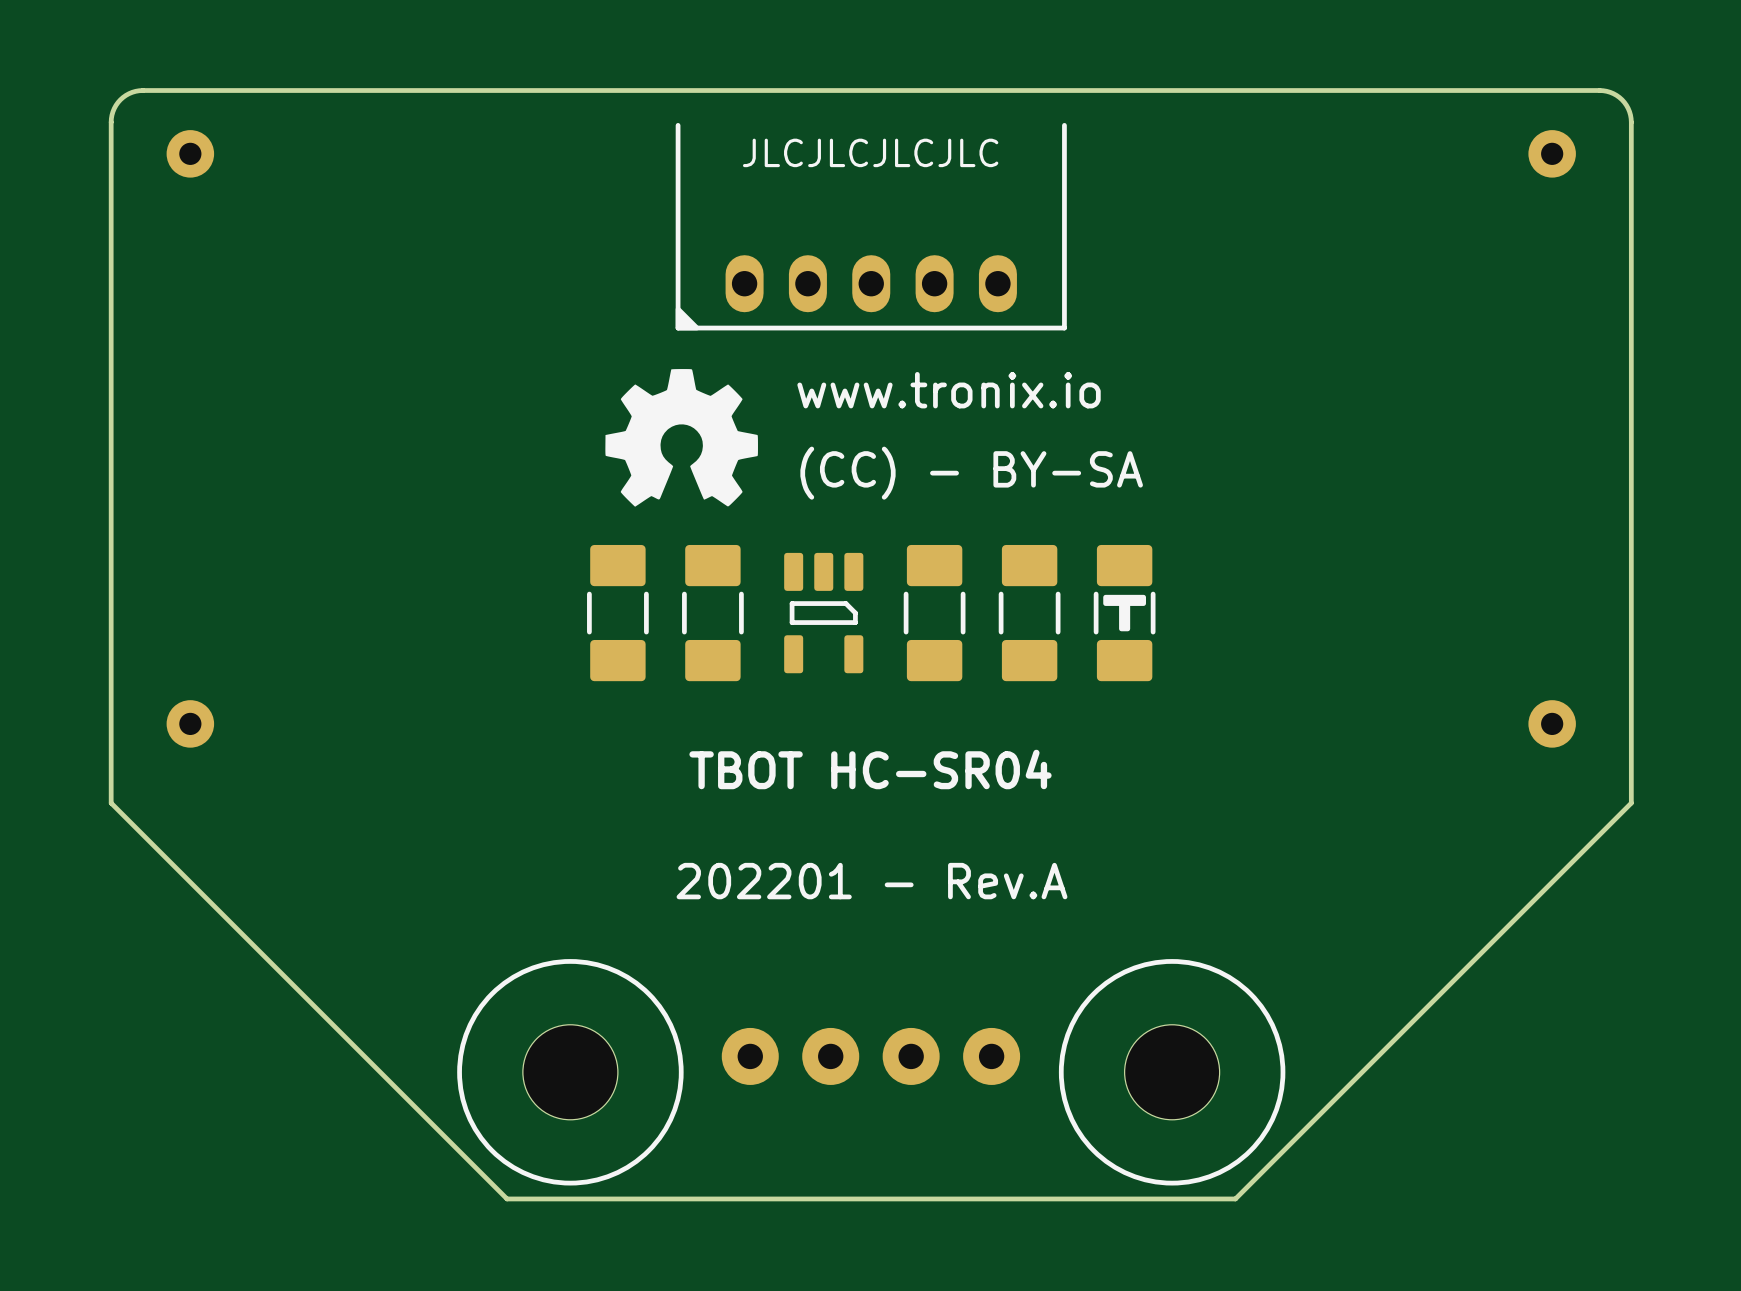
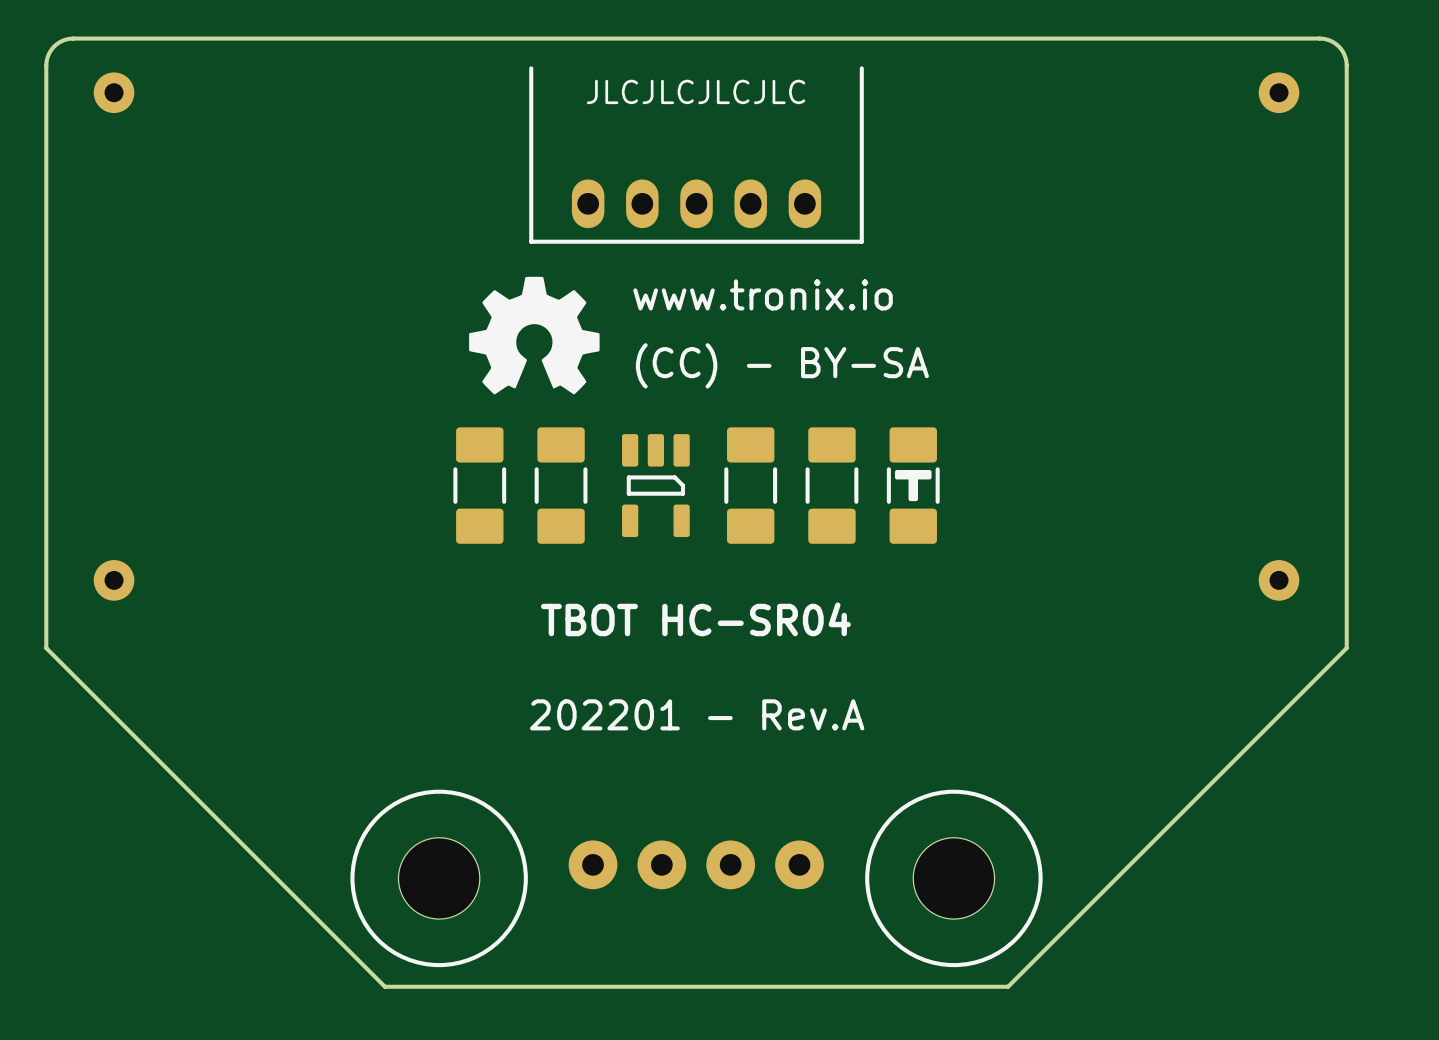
part footprint: [675, 122, 1067, 331] -> [529, 66, 864, 244]
part footprint: [457, 959, 684, 1186] -> [350, 789, 528, 968]
part footprint: [1058, 959, 1286, 1186] -> [865, 789, 1043, 968]

